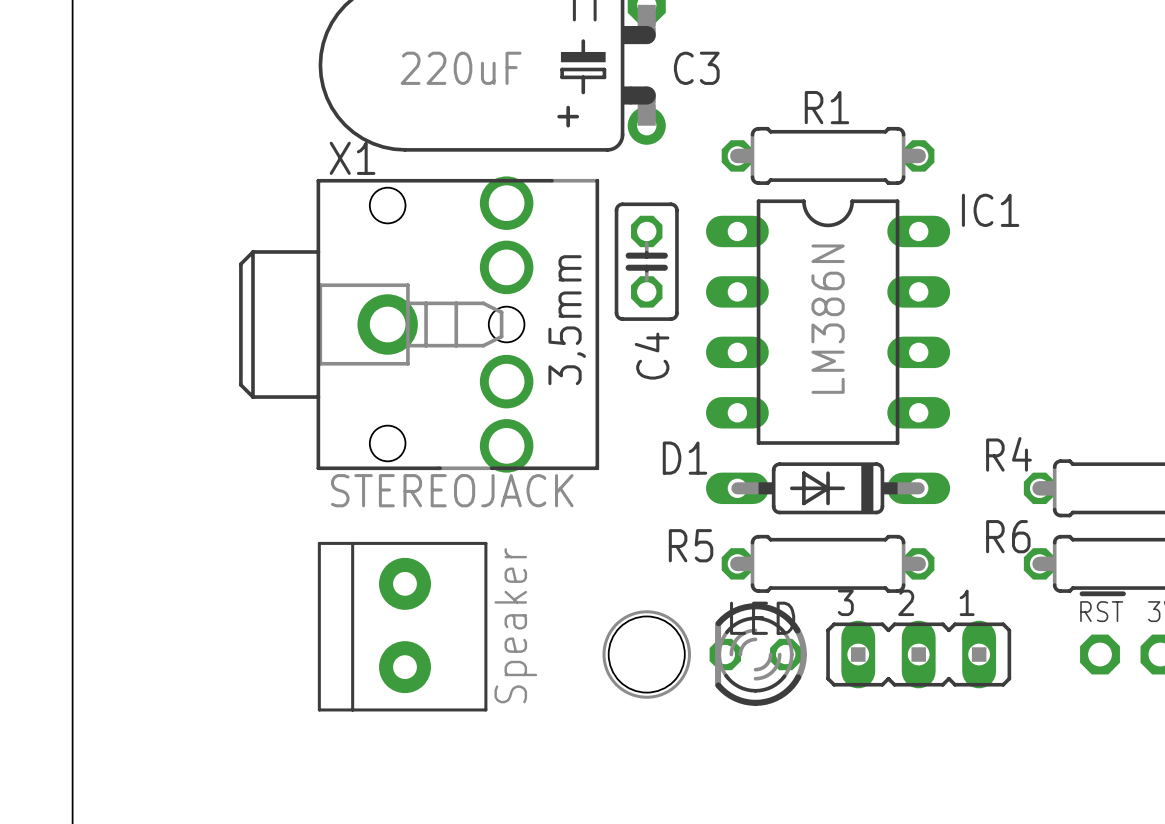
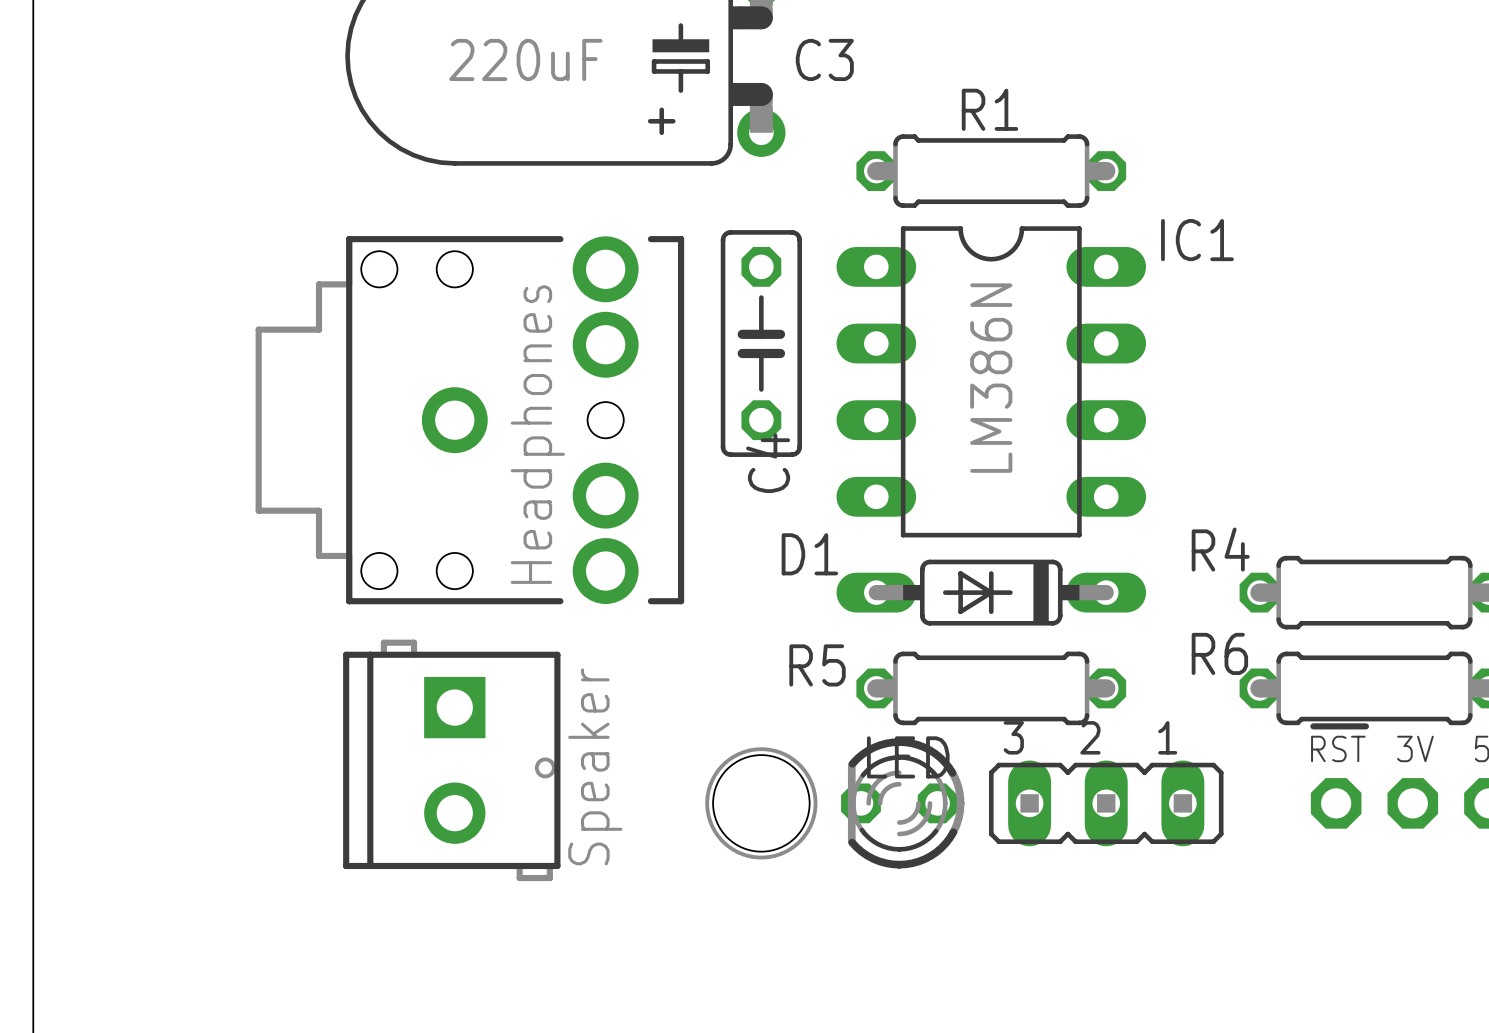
C4 footprint: [614, 202, 679, 321] -> [720, 230, 802, 457]
X1: STEREOJACK (419, 324) -> none
part: none -> (469, 420)
part footprint: [317, 541, 488, 712] -> [343, 639, 561, 882]

